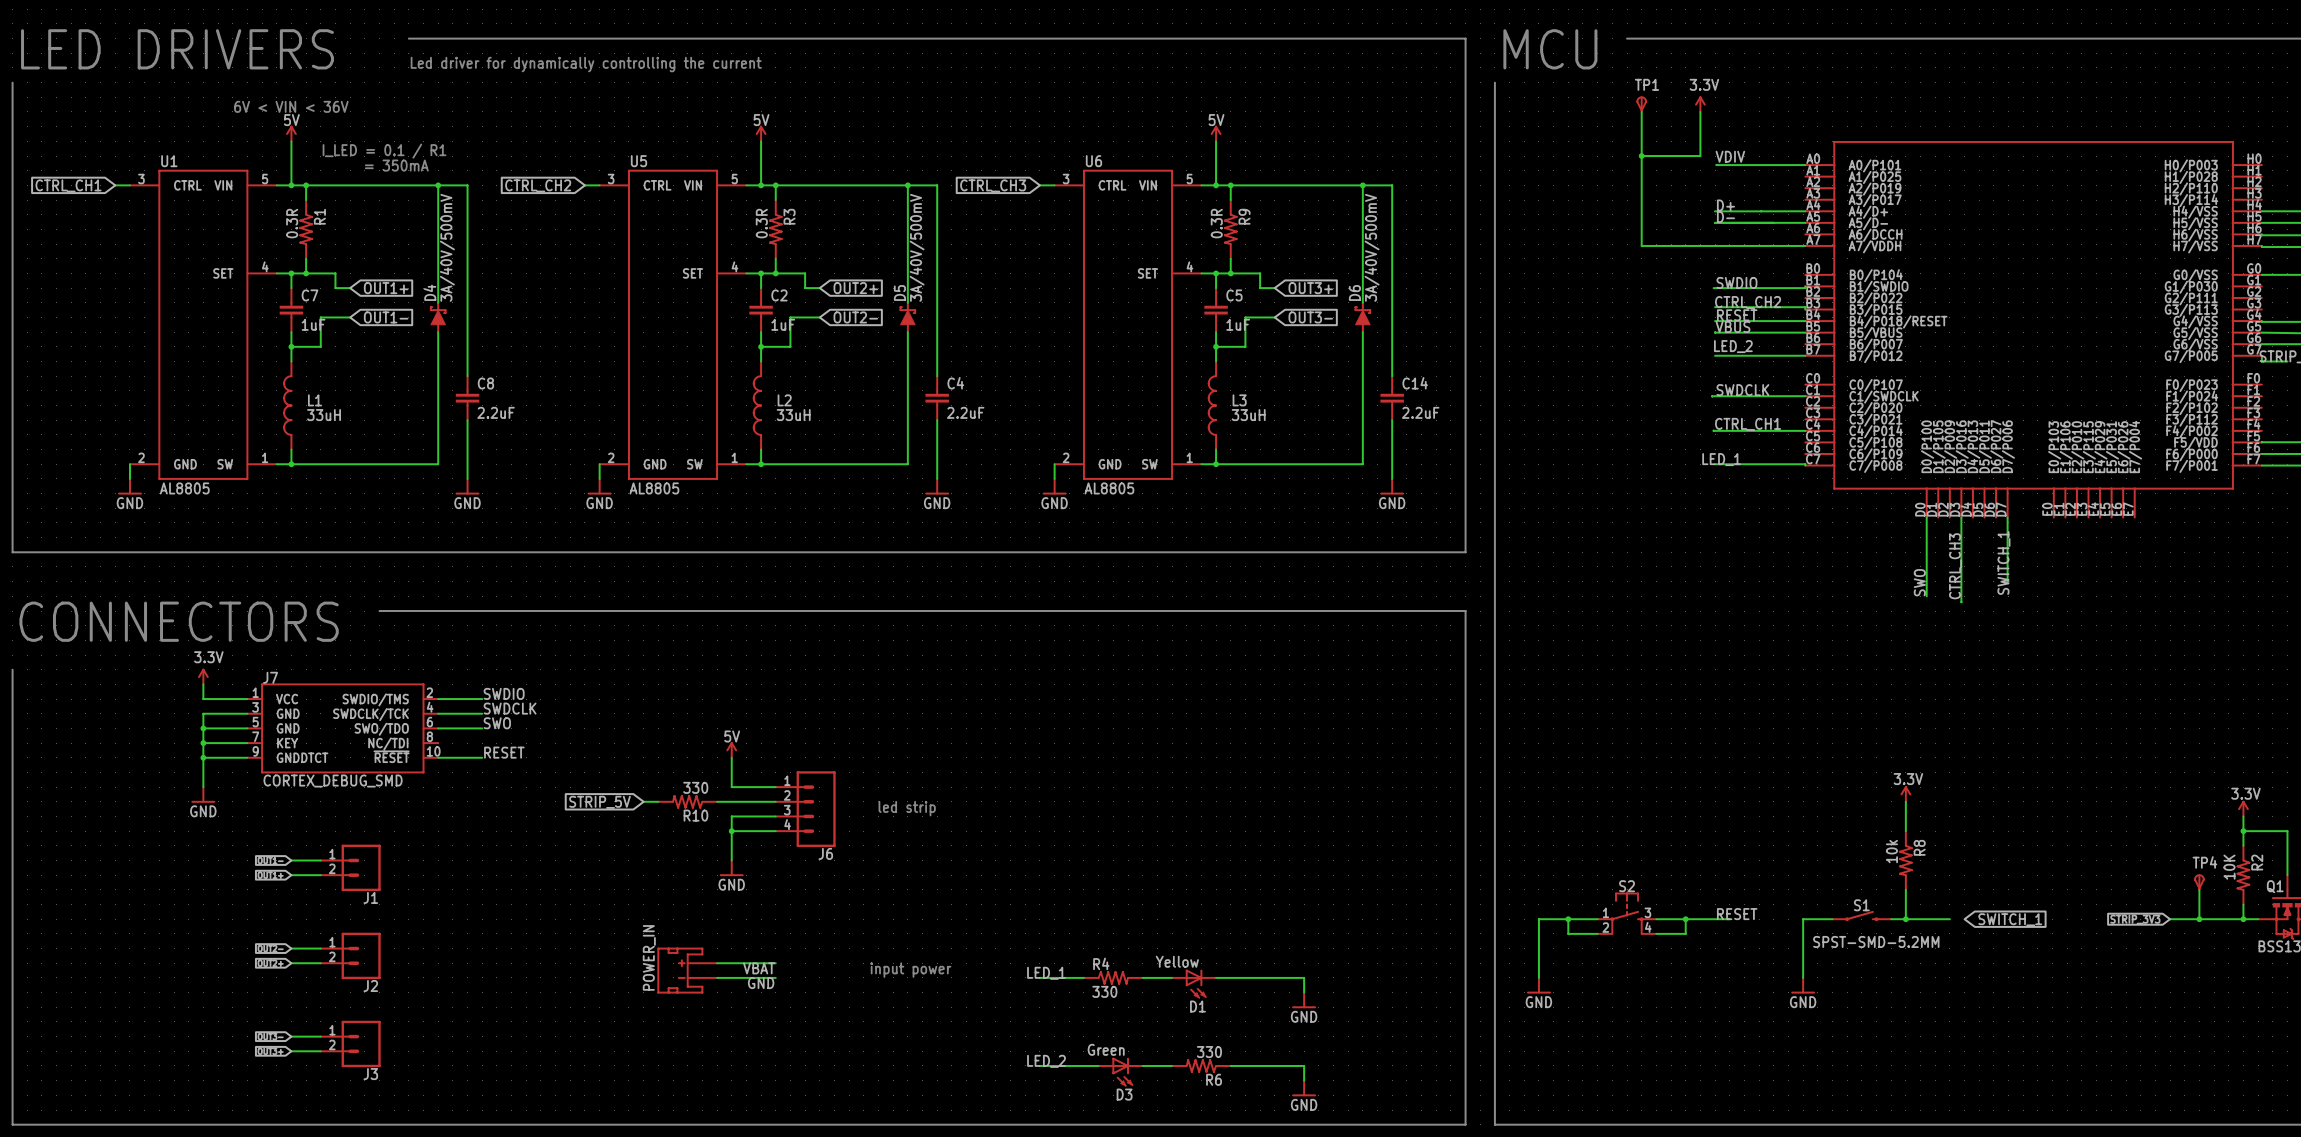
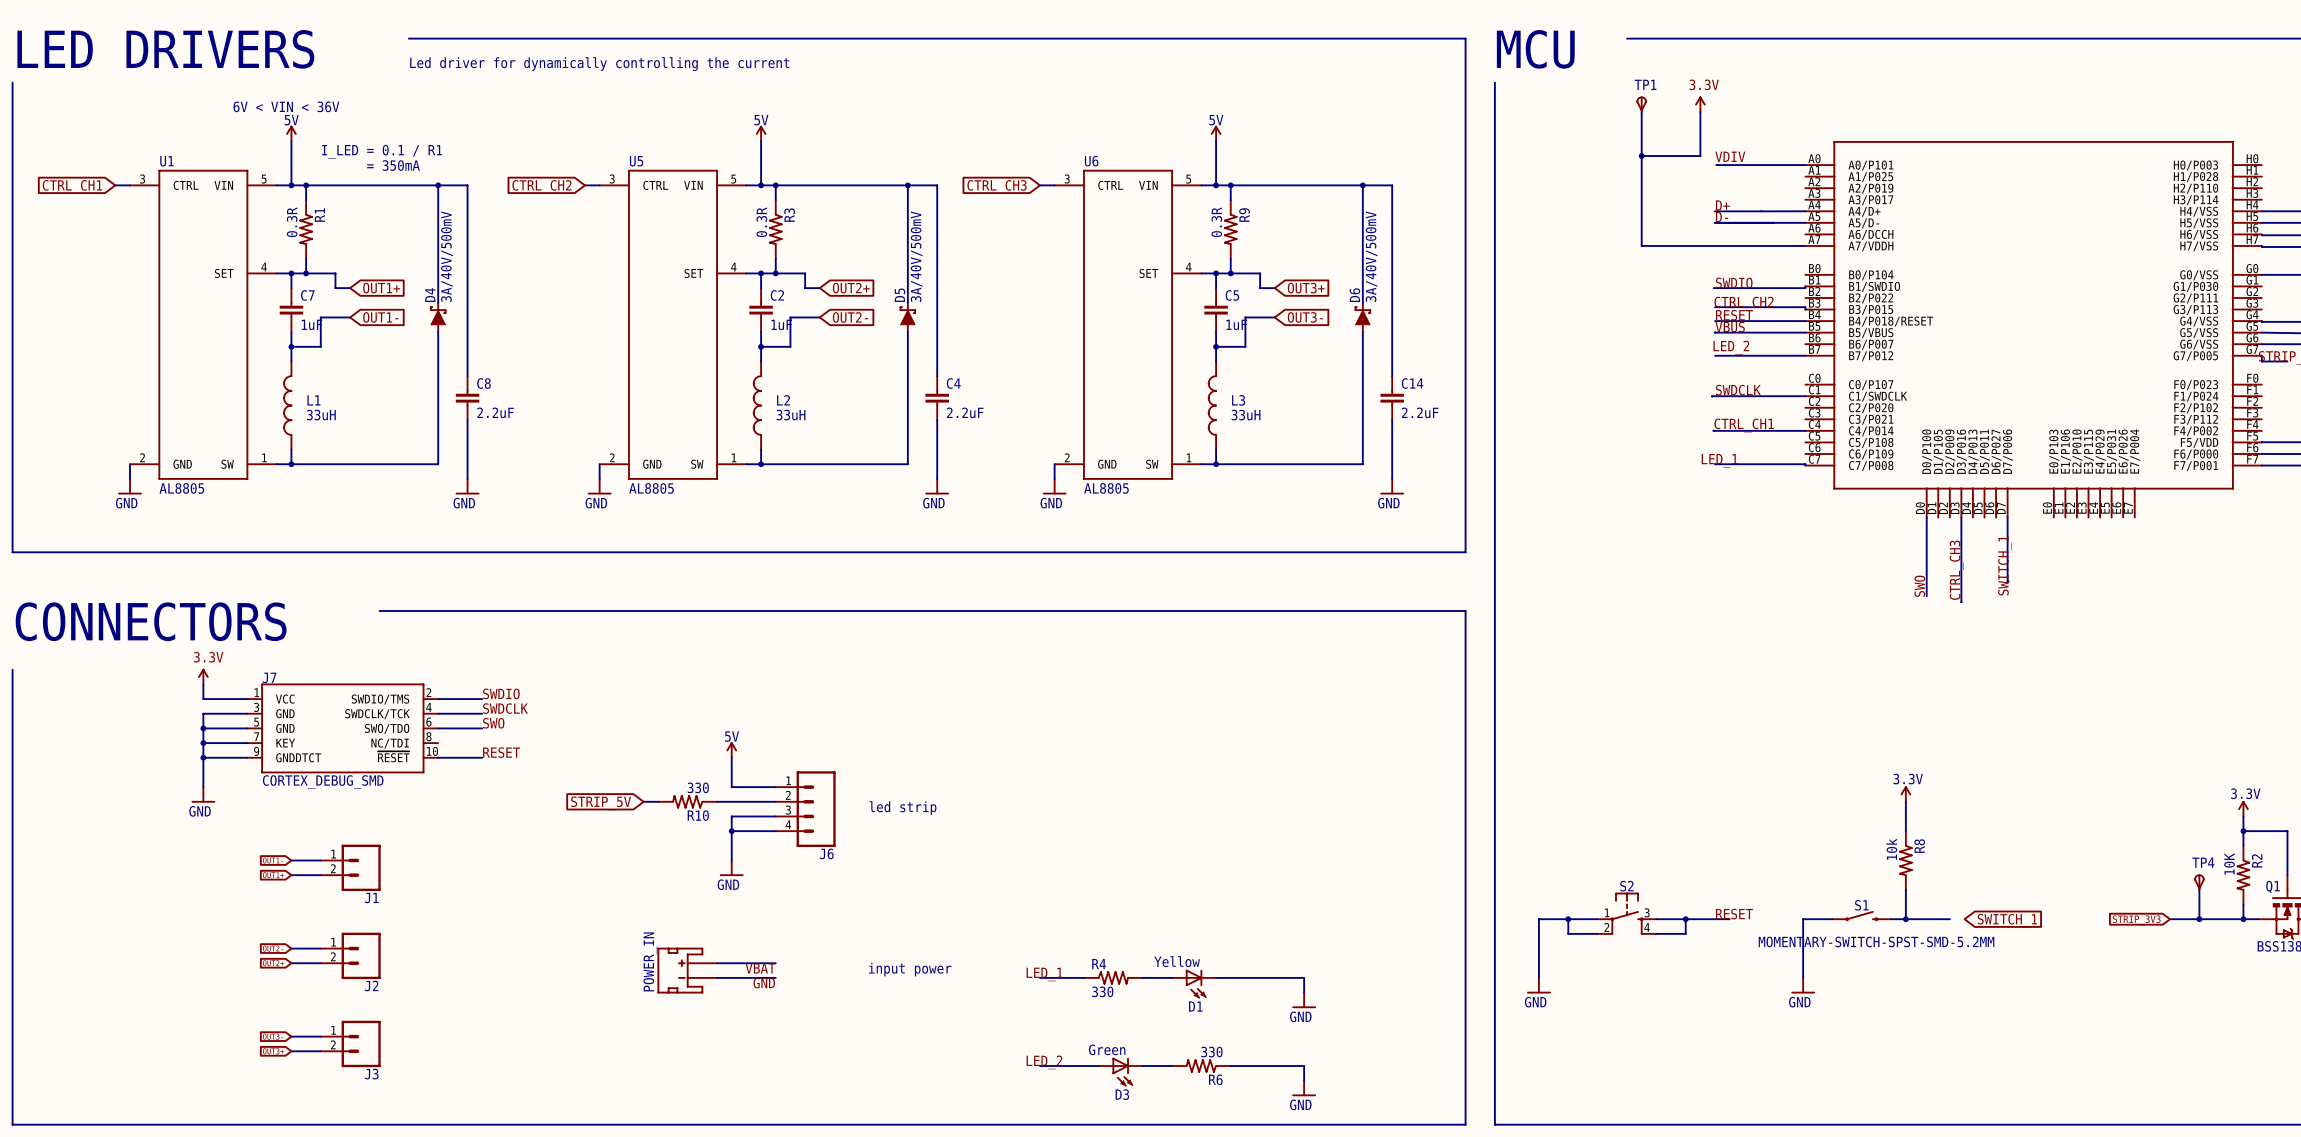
S1 value: SPST-SMD-5.2MM (1876, 941) -> MOMENTARY-SWITCH-SPST-SMD-5.2MM (1876, 941)

